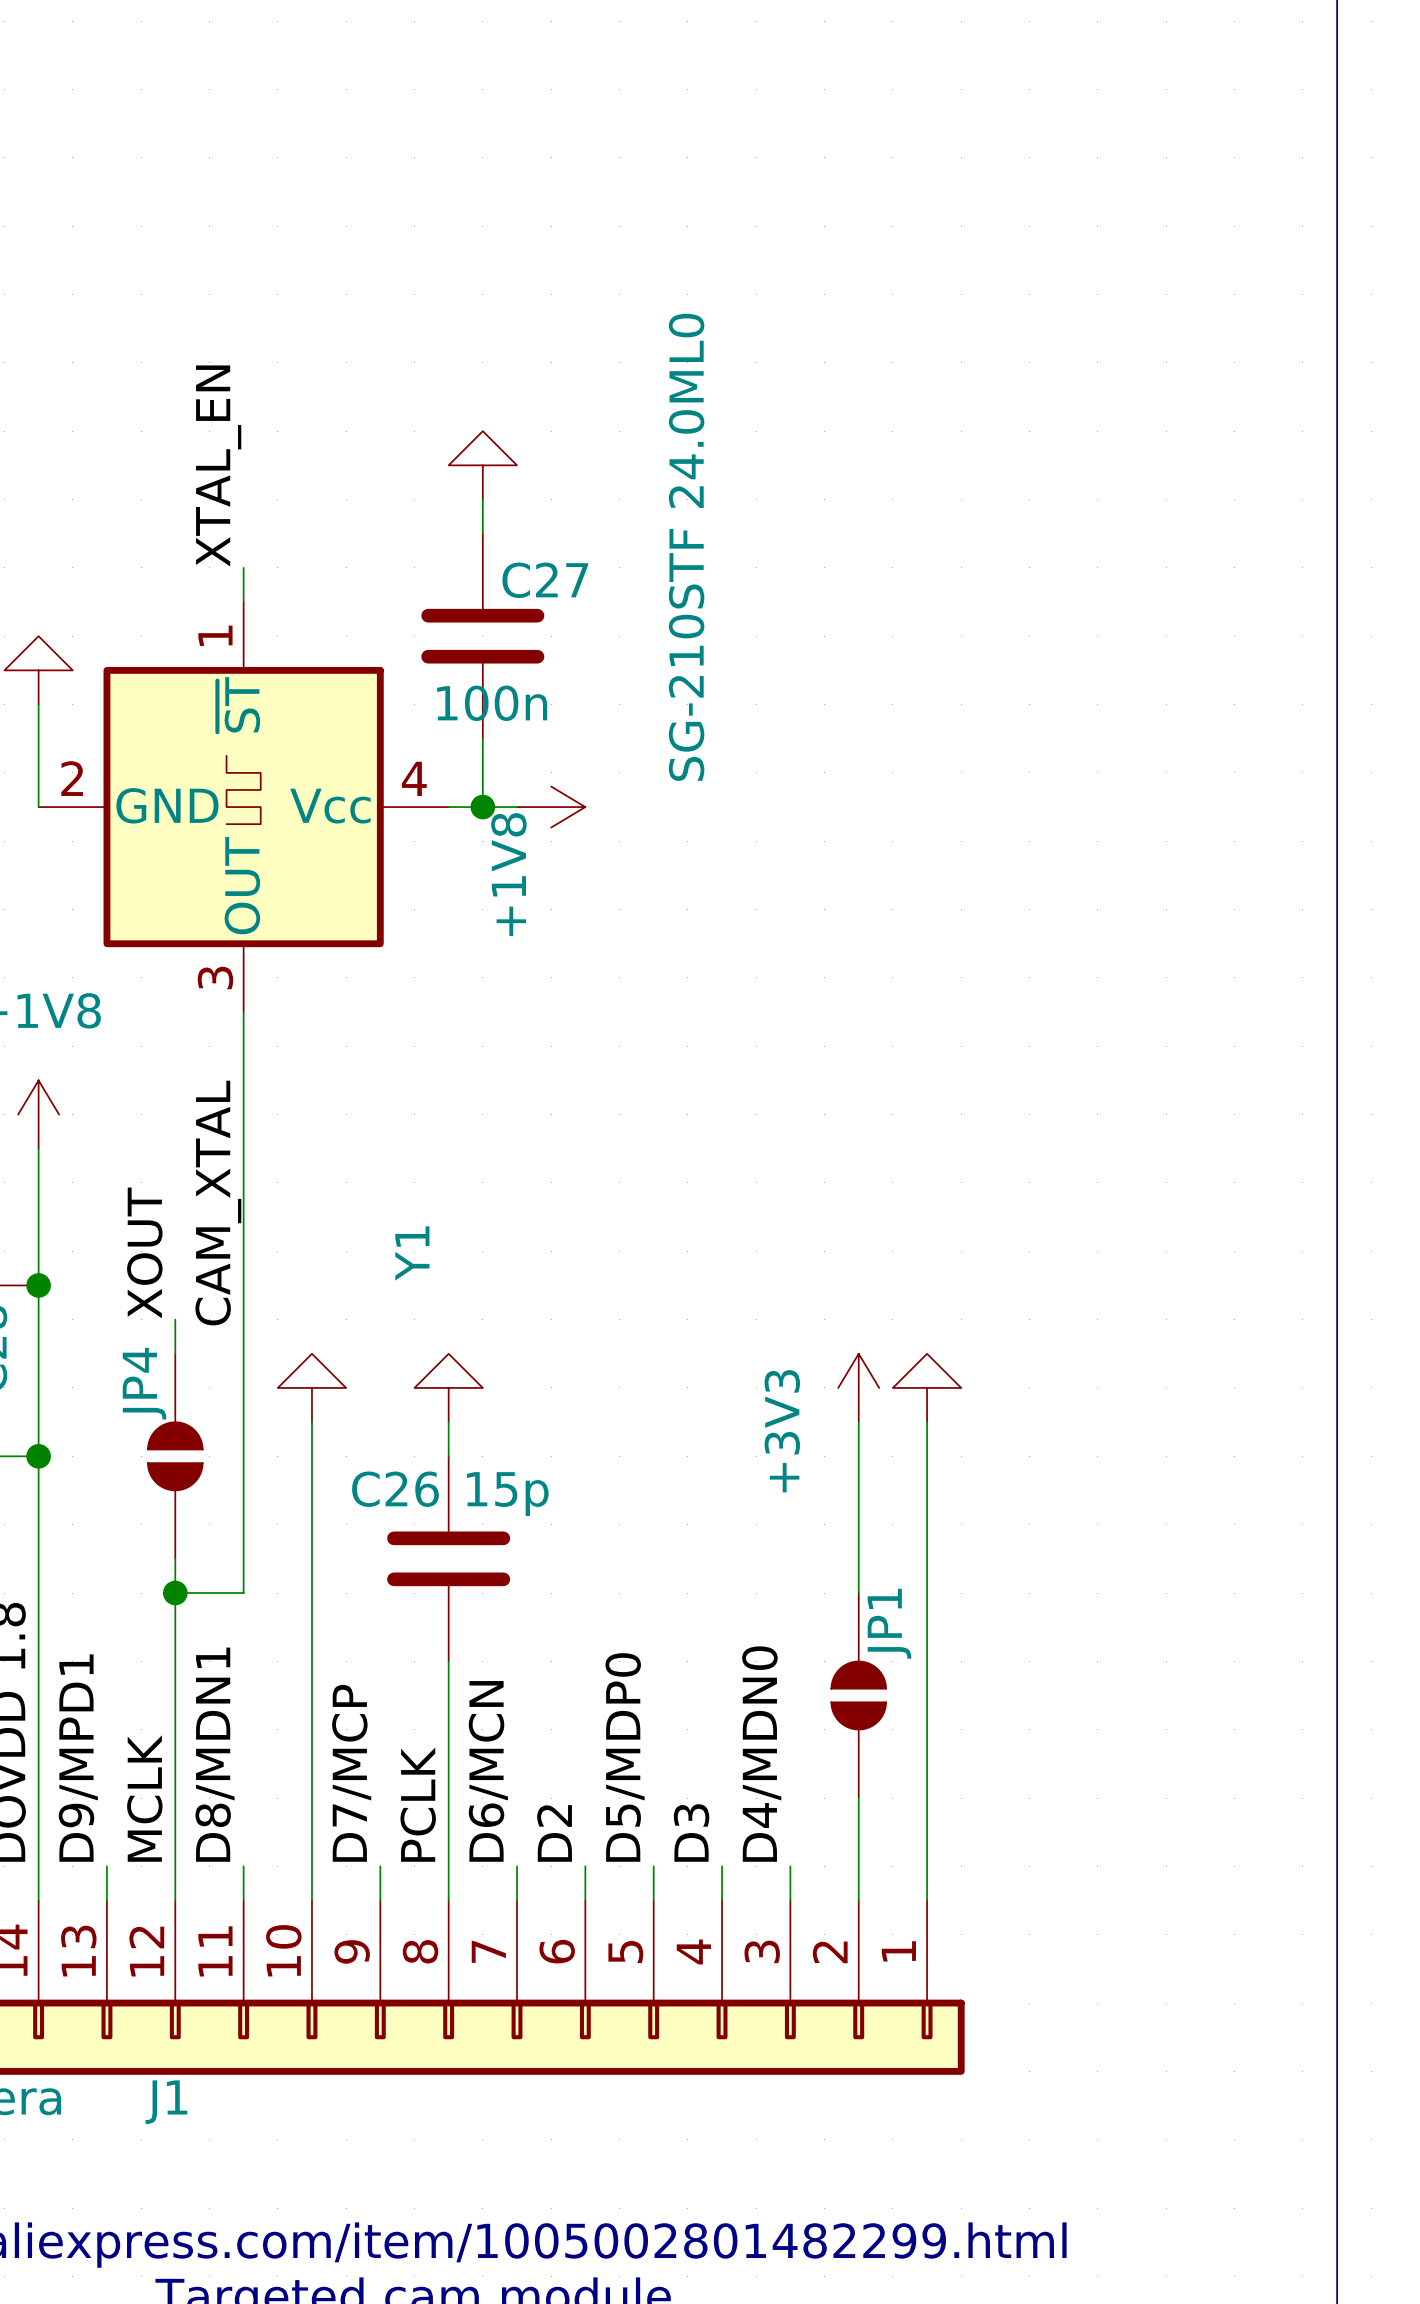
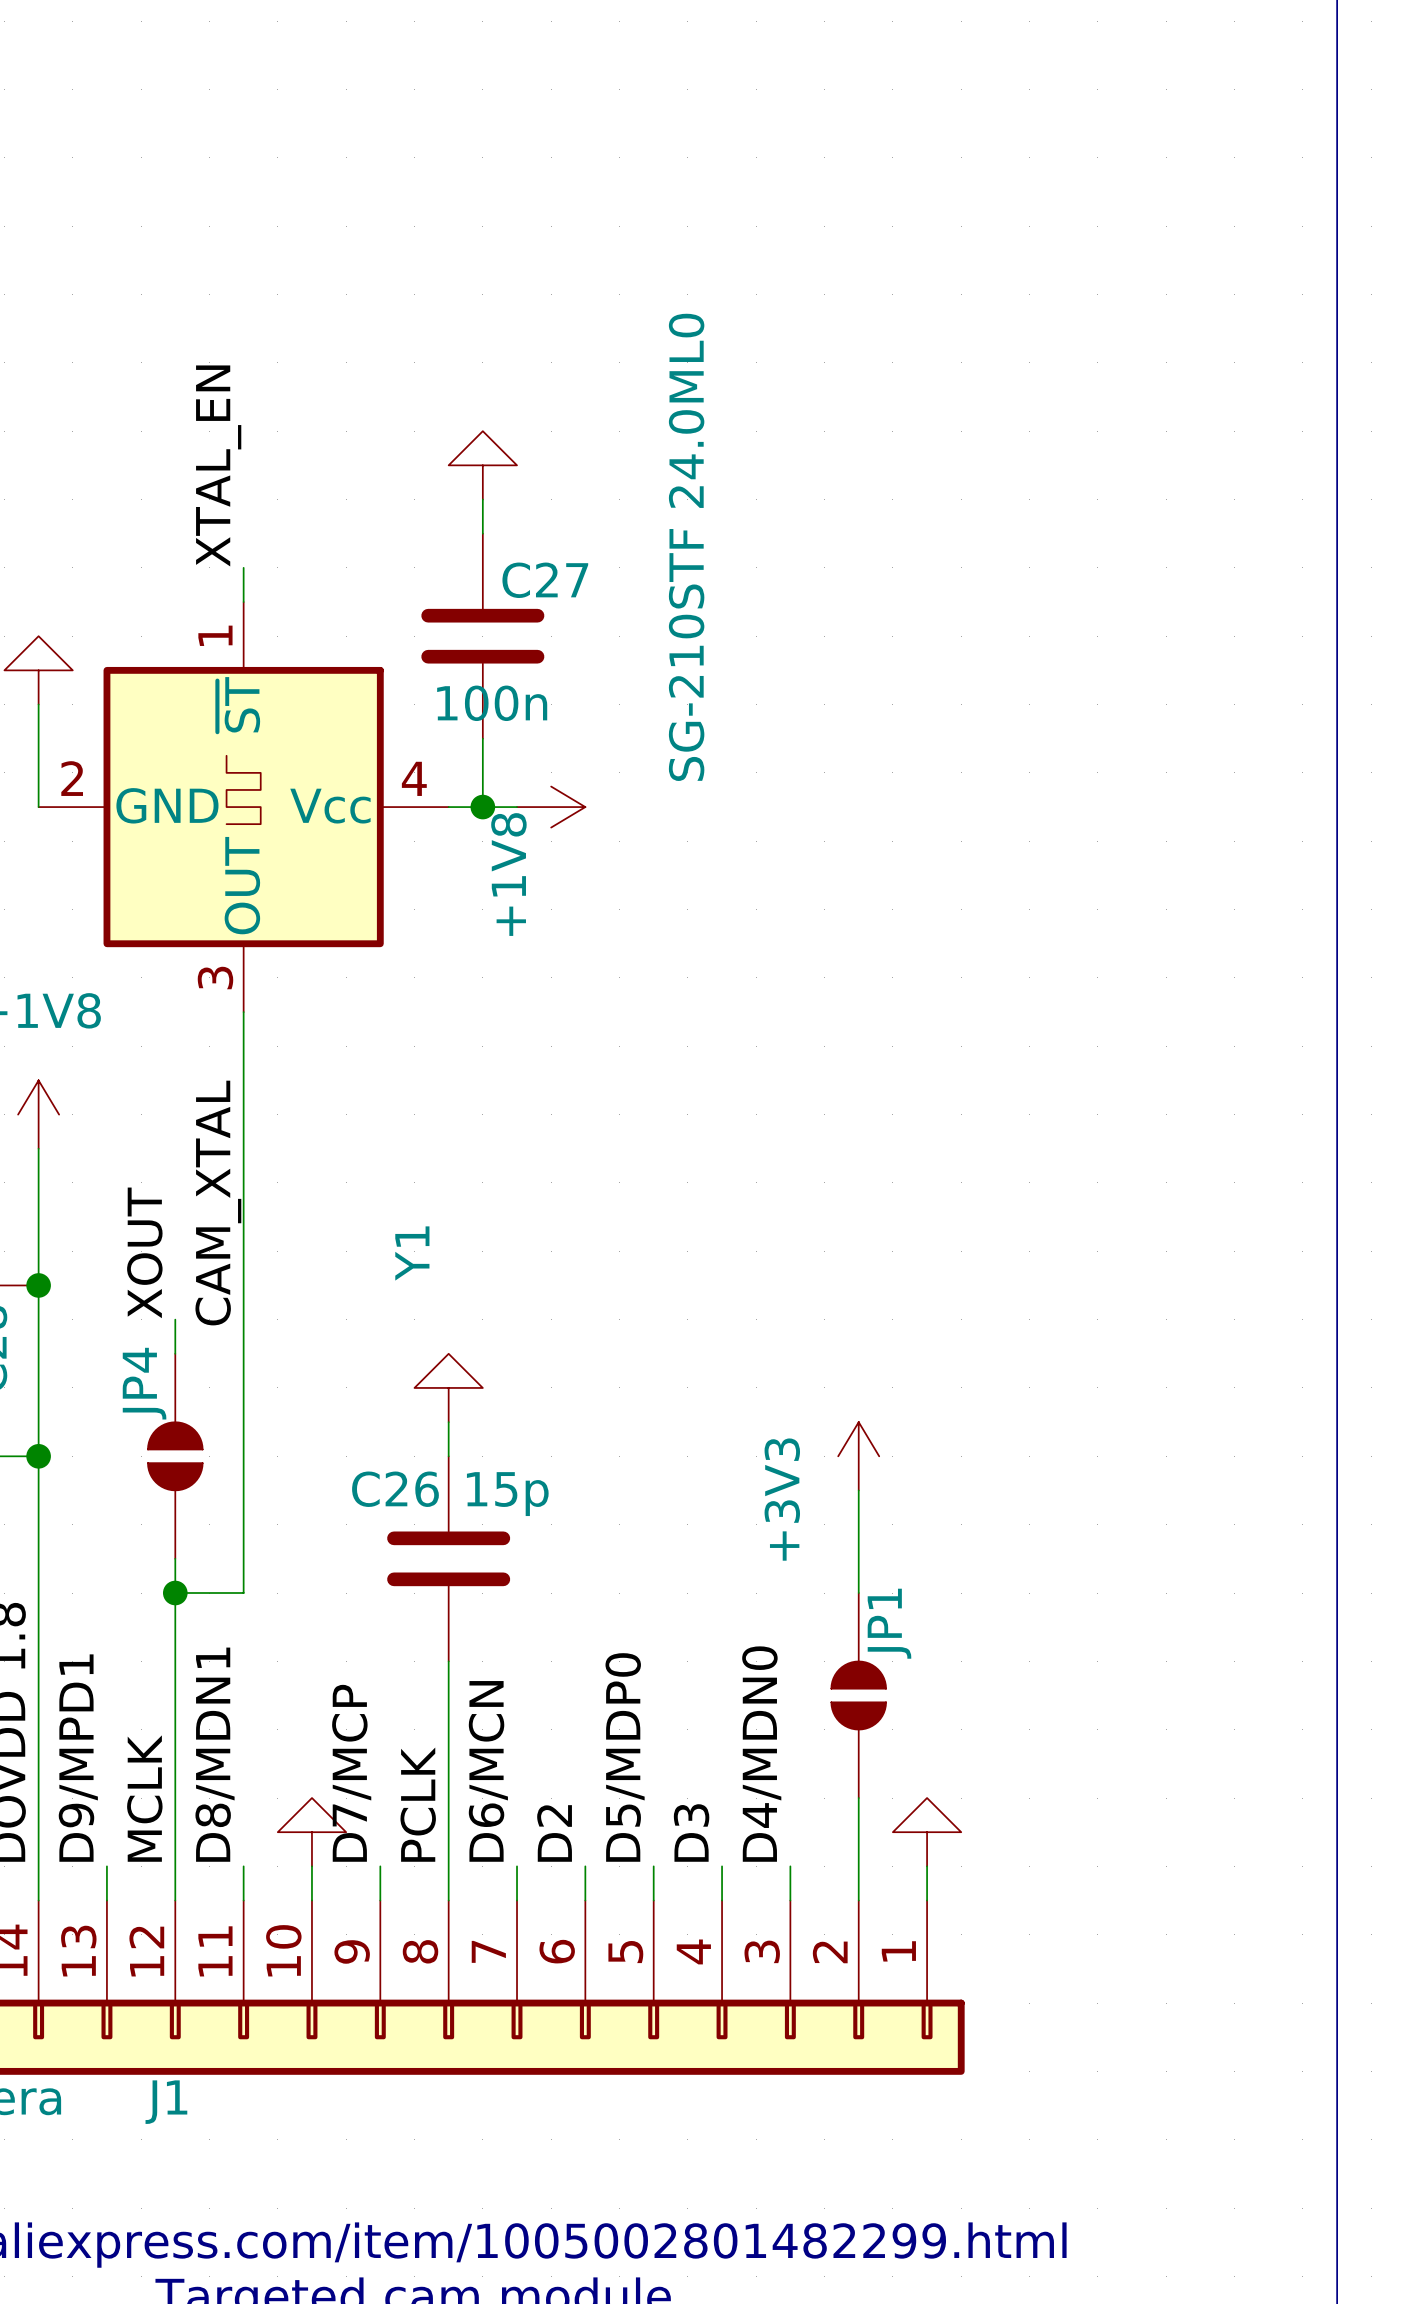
power symbol: (311, 1387) -> none
power symbol position: +3V3 (858, 1387) -> +3V3 (858, 1456)
power symbol: (927, 1387) -> none
wire: (311, 1422) (311, 1866) -> none
wire: (927, 1422) (927, 1866) -> none
power symbol: none -> (311, 1832)
power symbol: none -> (927, 1832)

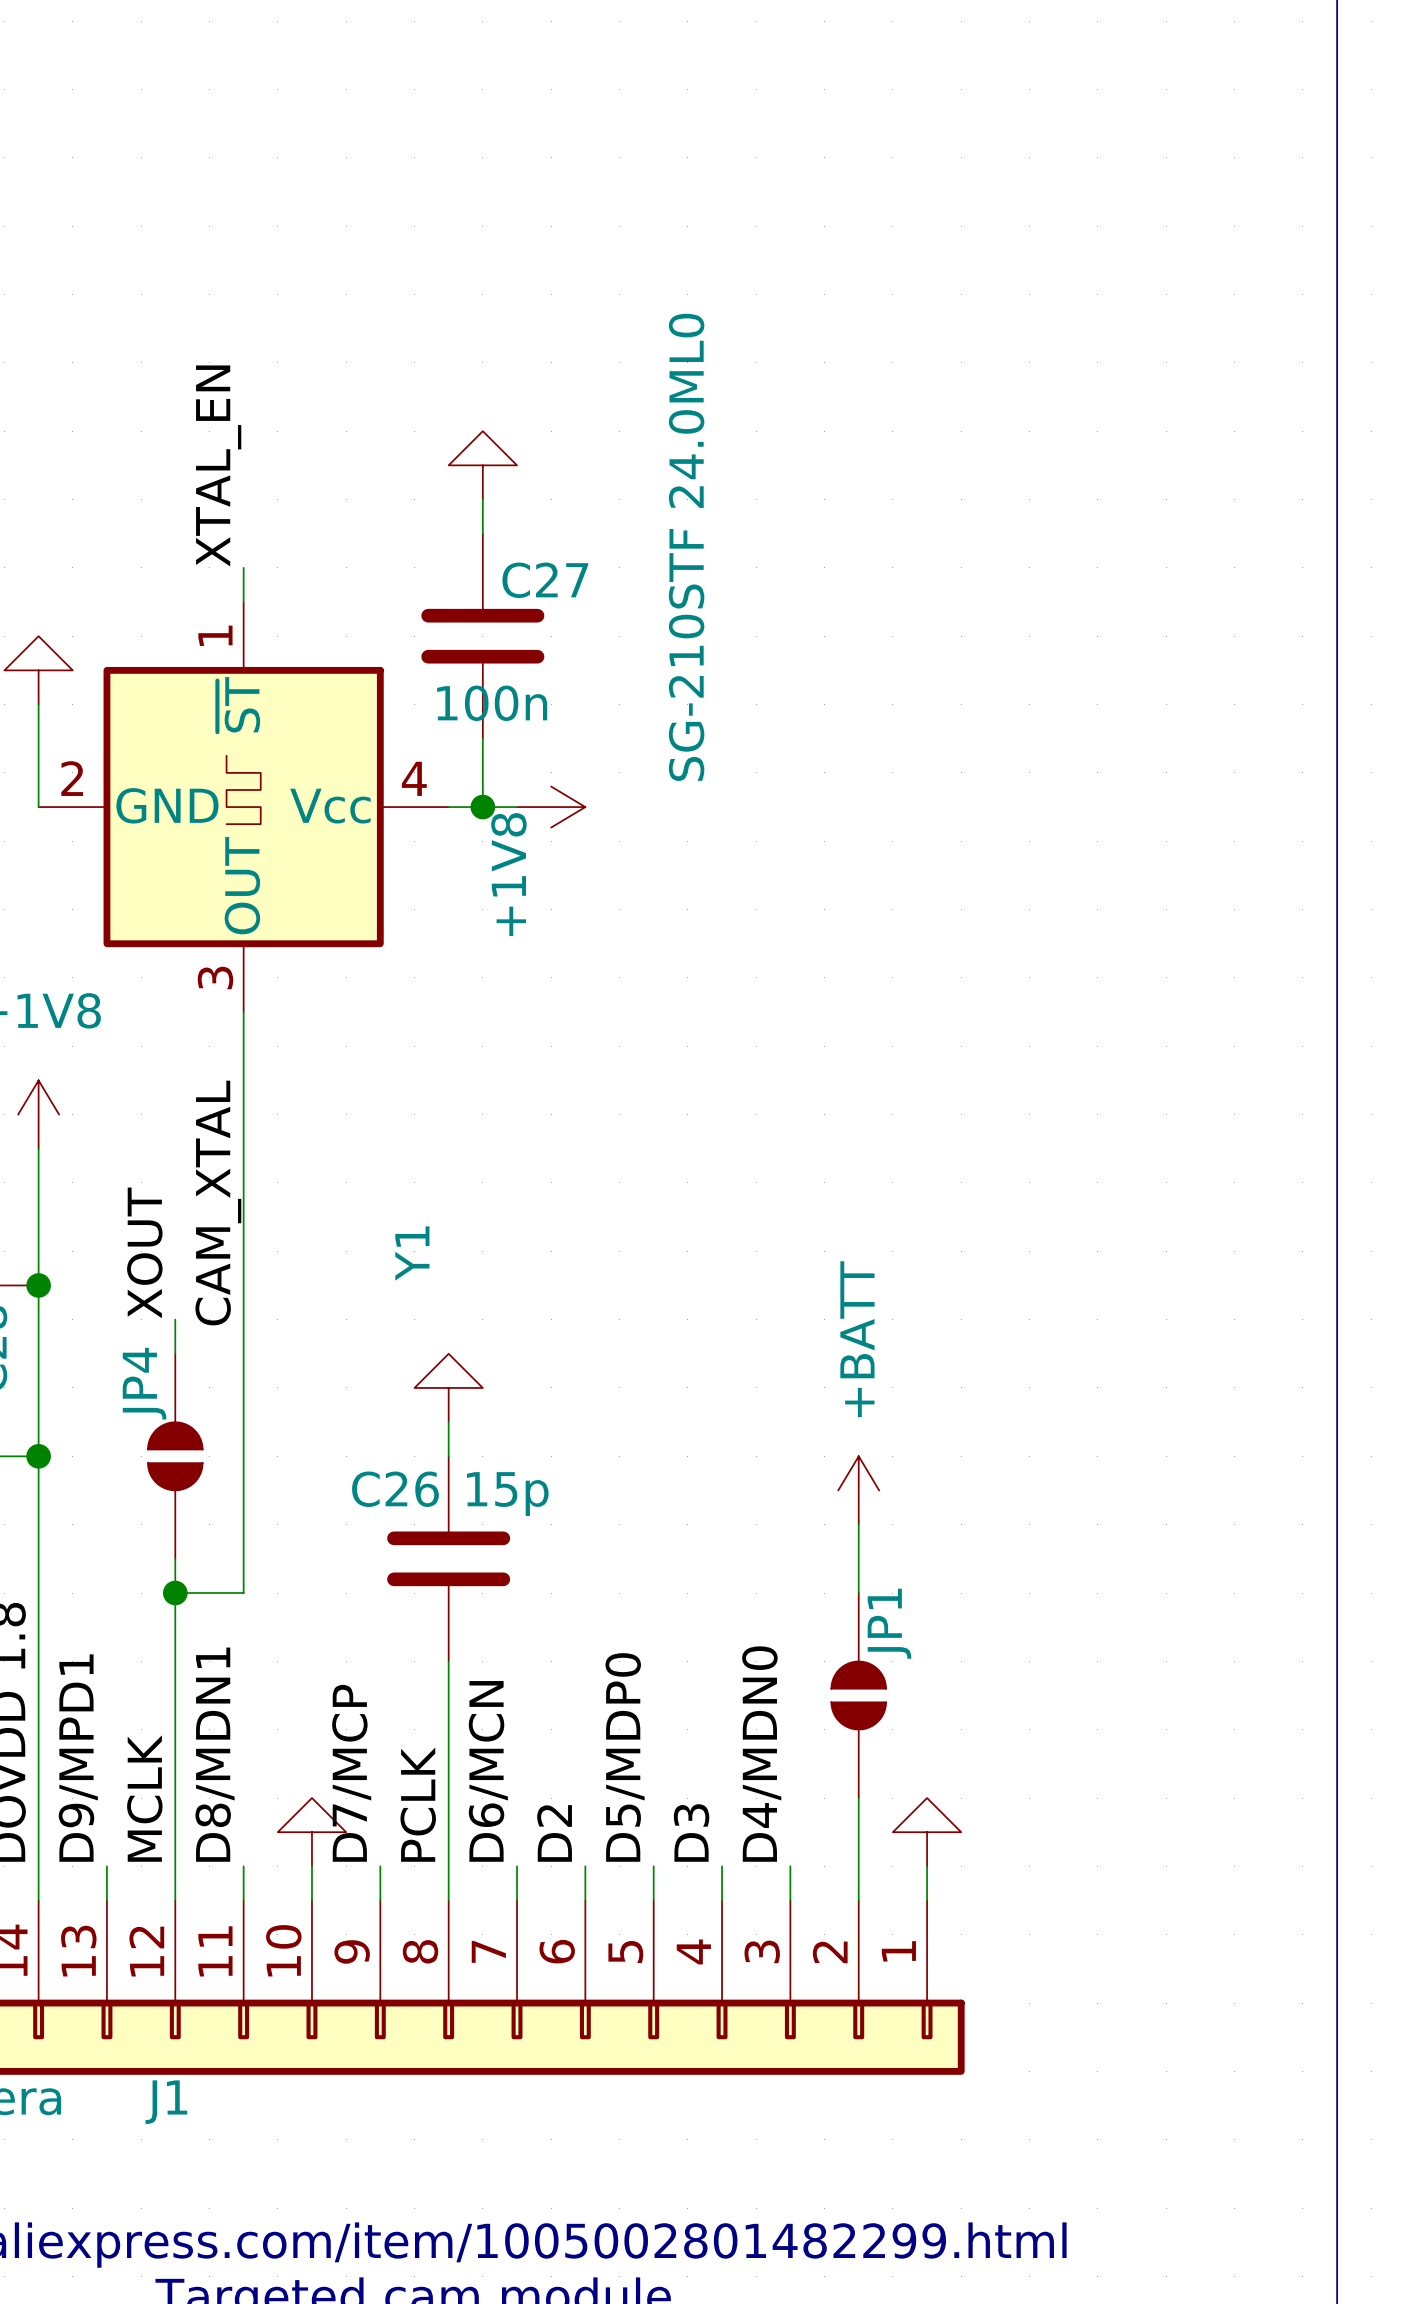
power symbol: +3V3 (858, 1456) -> none
power symbol: none -> +BATT (858, 1490)

